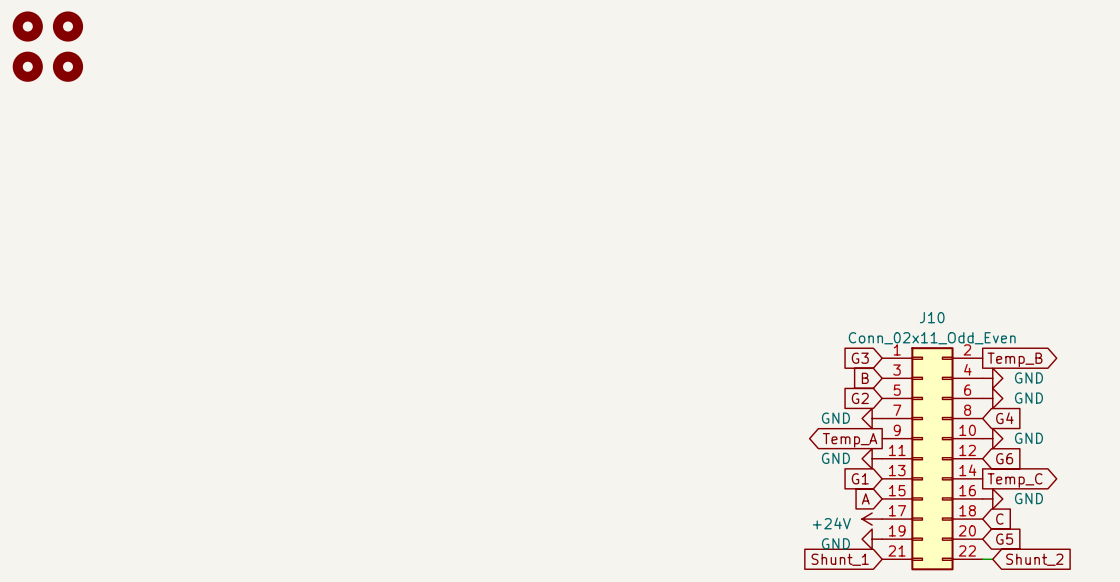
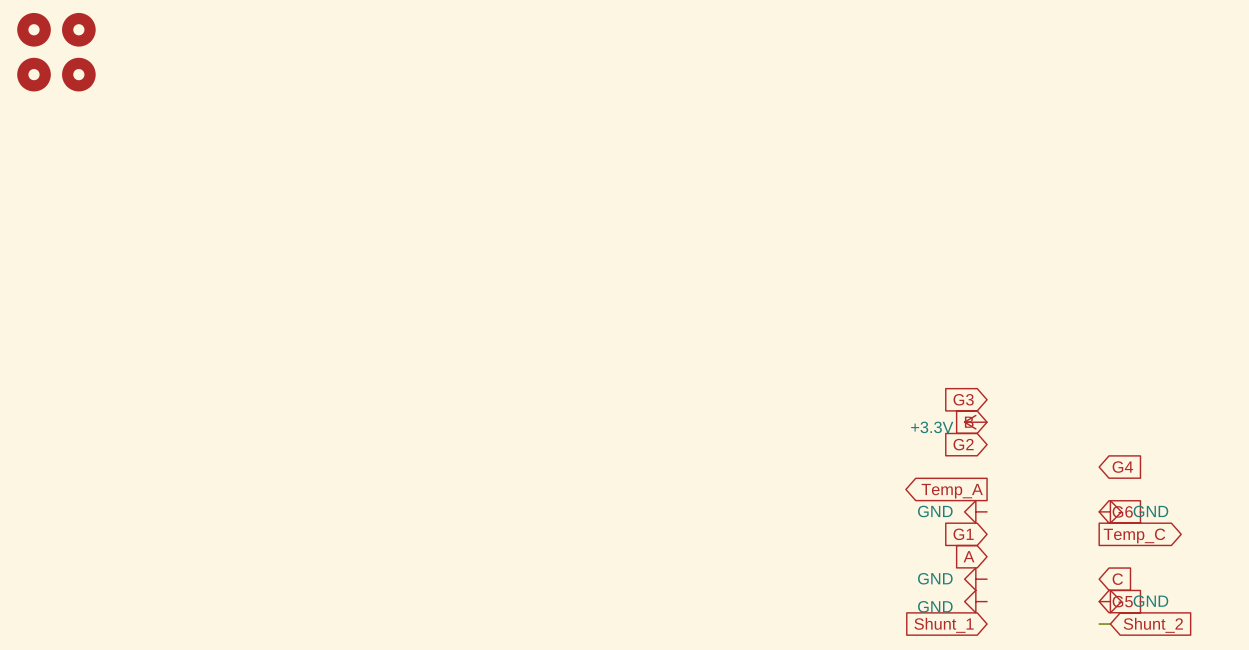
global label: Temp_B (1015, 359) -> none
power symbol: none -> +3.3V (975, 422)
power symbol: GND (992, 378) -> none
power symbol: GND (992, 398) -> none
power symbol: GND (872, 418) -> none
power symbol: GND (992, 438) -> none
J10: Conn_02x11_Odd_Even (932, 458) -> none
power symbol: none -> GND (1110, 511)
power symbol: GND (992, 498) -> none
power symbol: +24V (872, 519) -> GND (975, 579)
power symbol: none -> GND (1110, 601)

